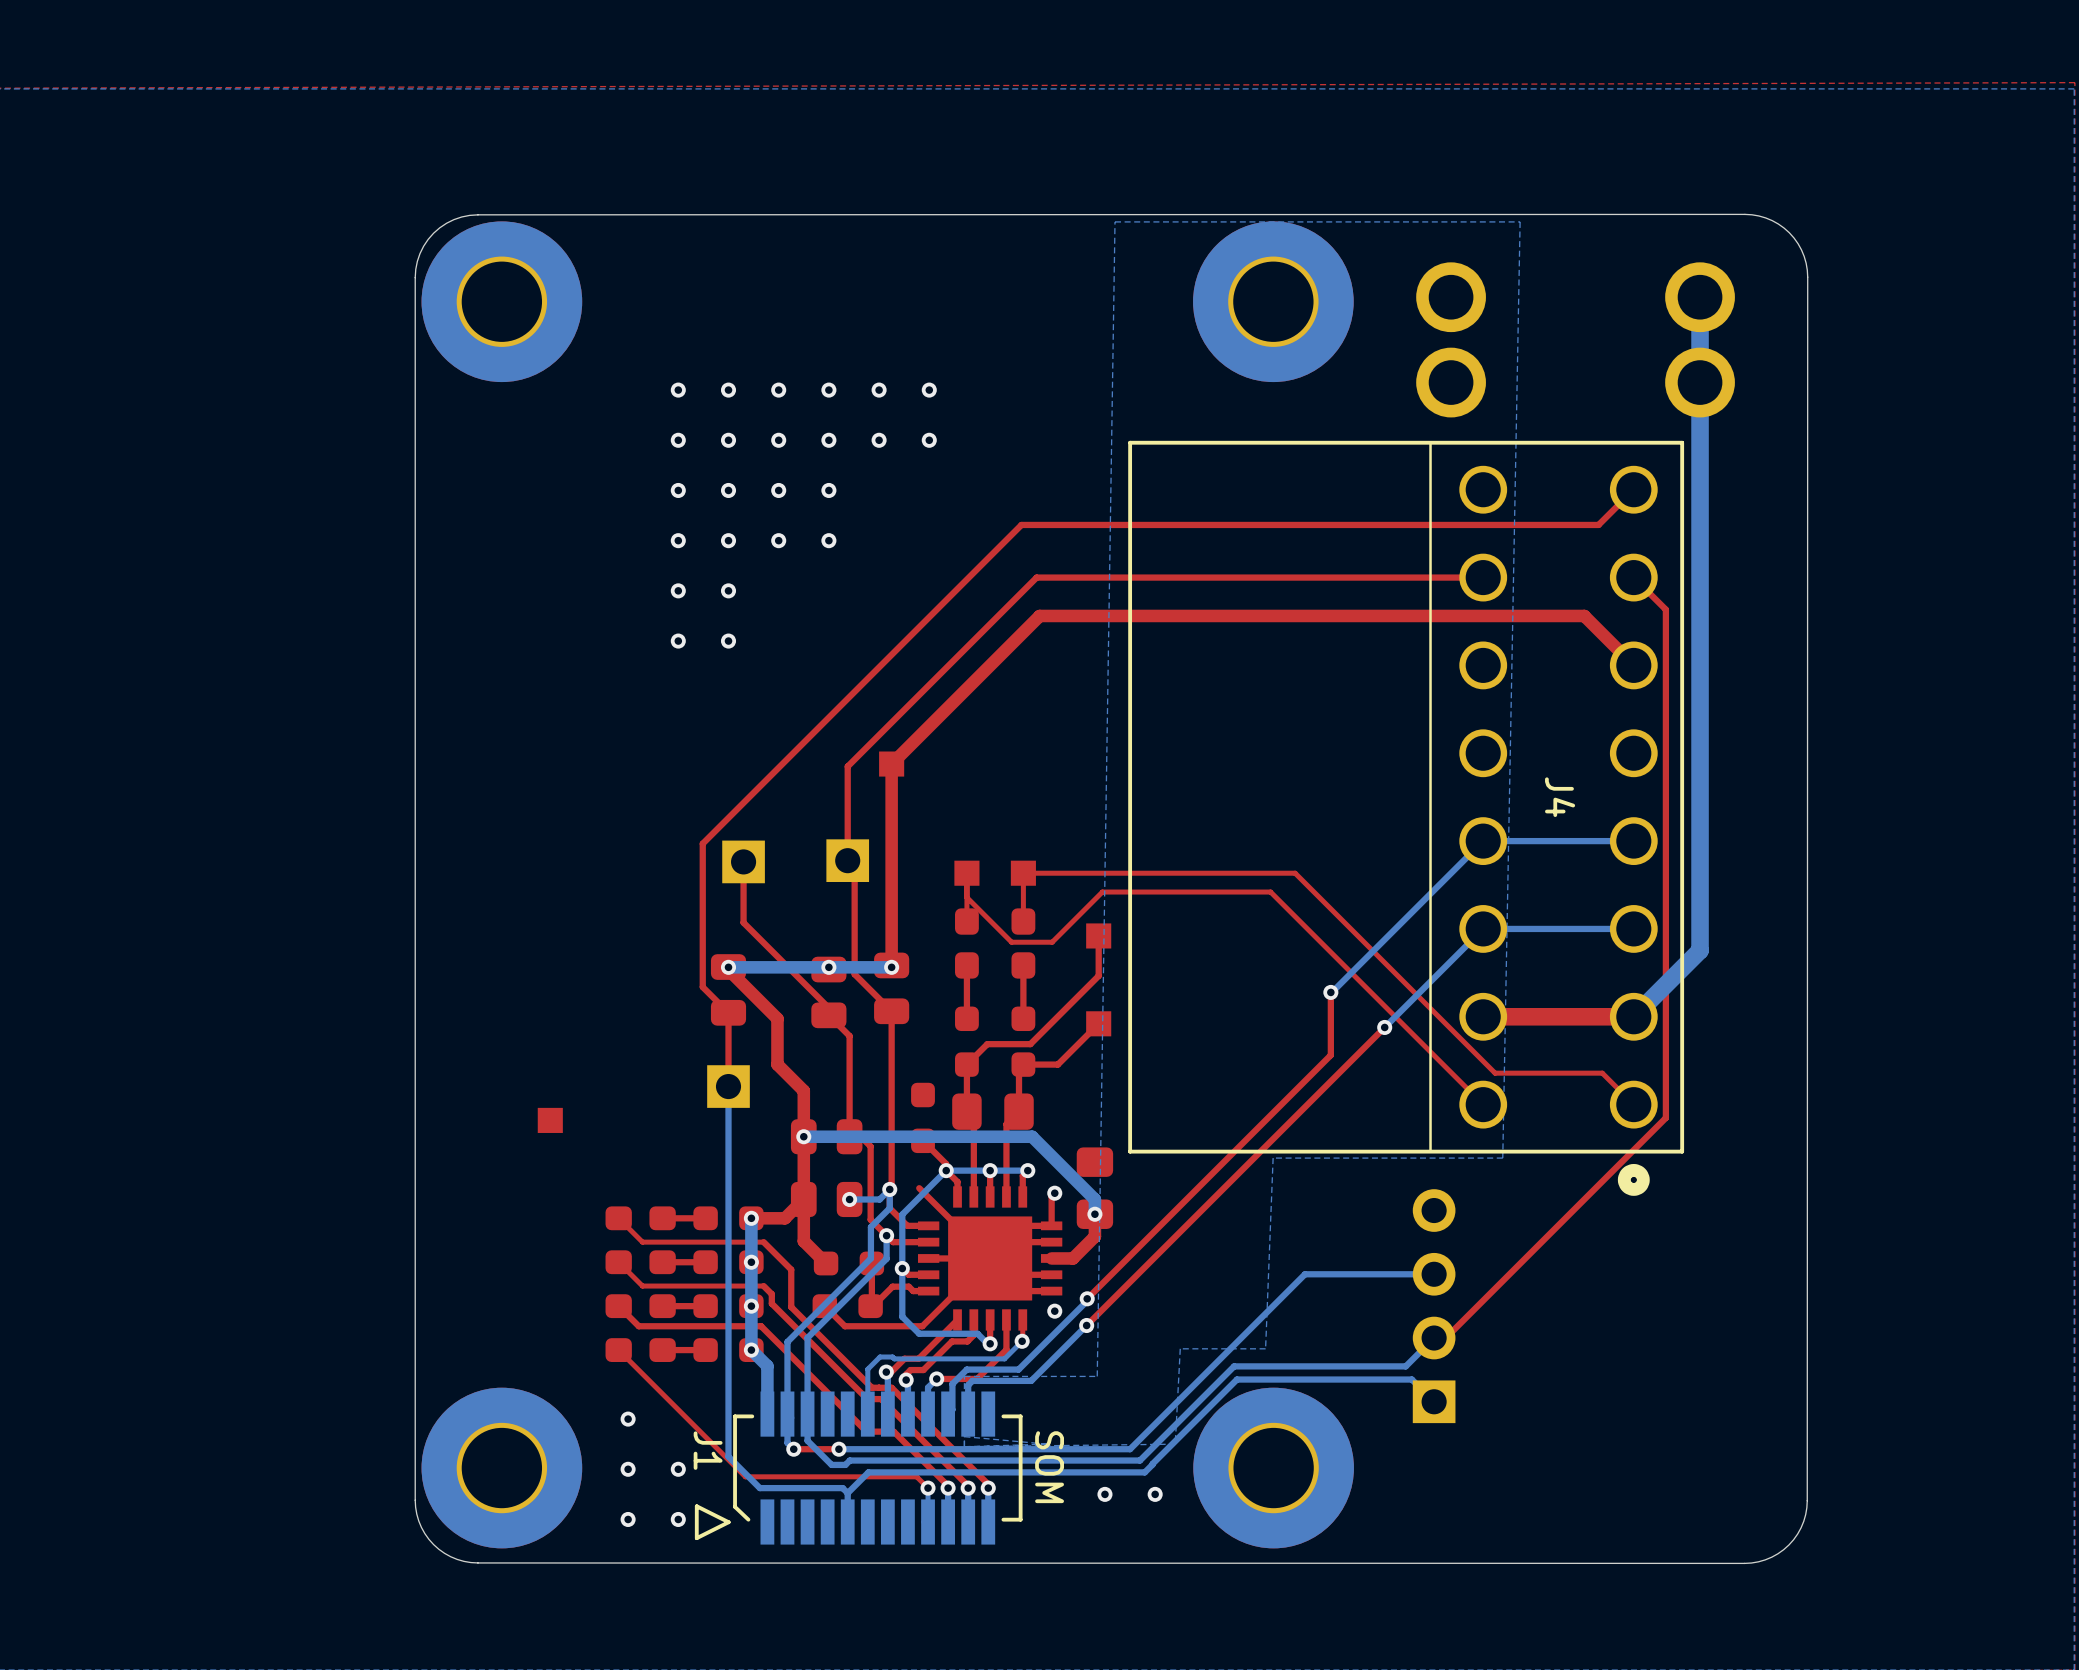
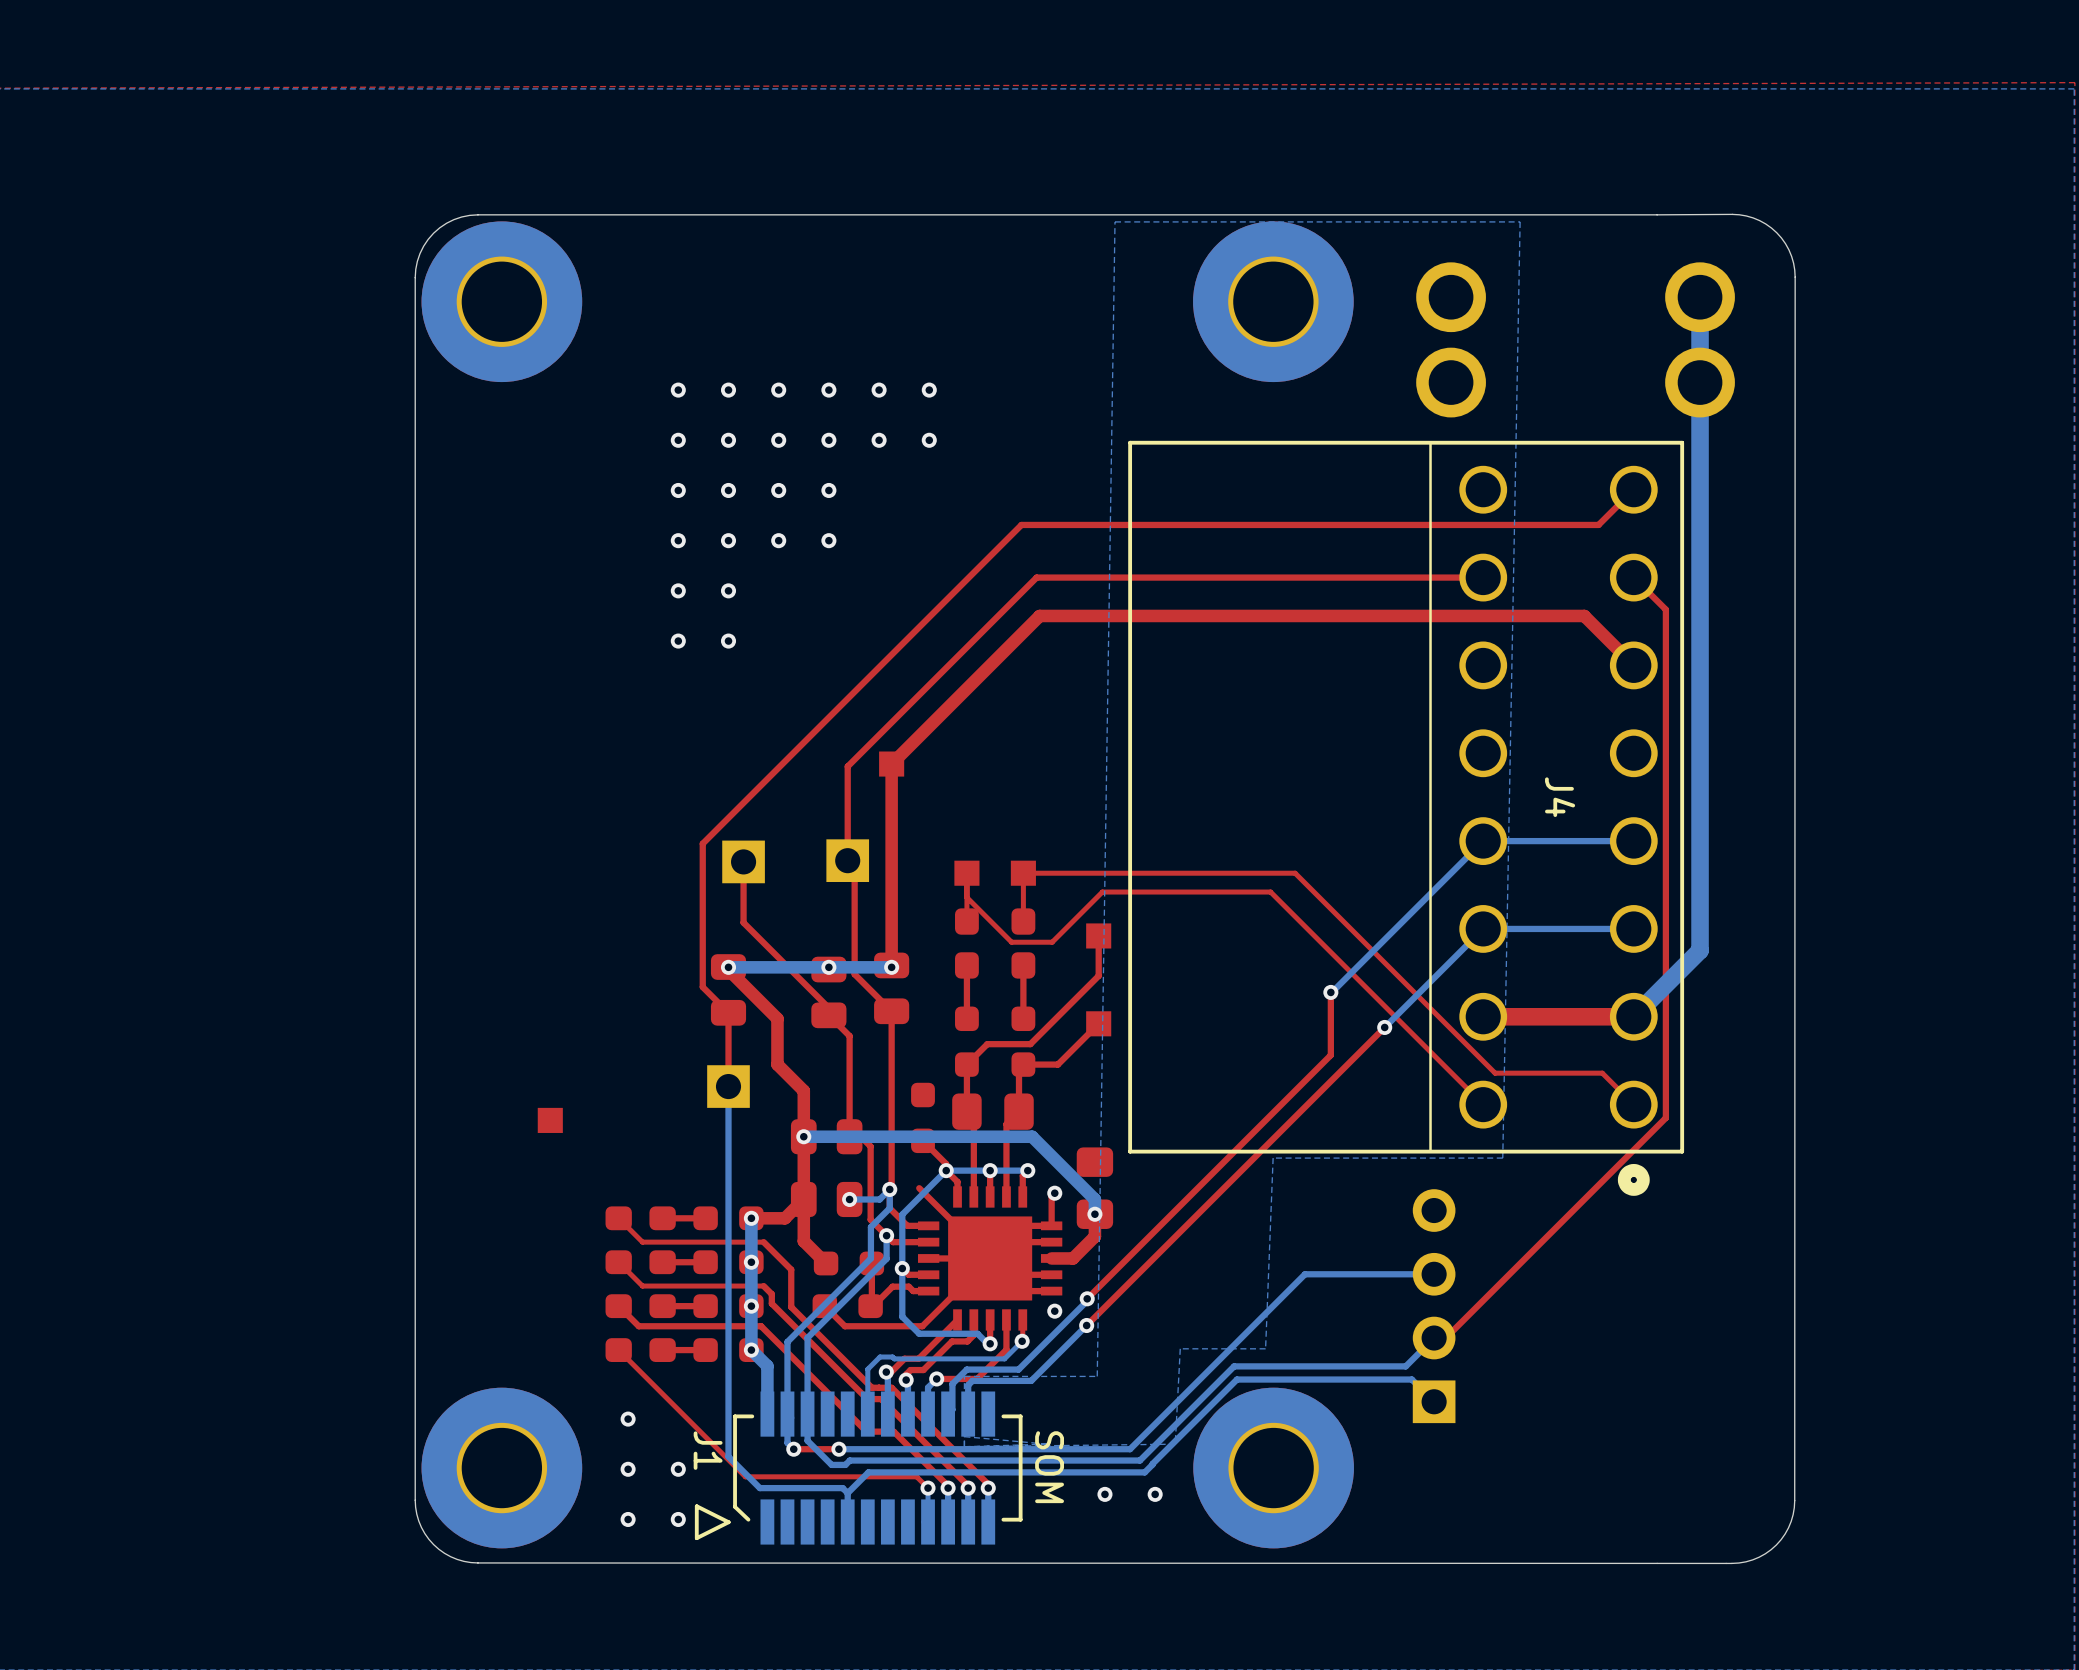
board edge: (477, 214) (1744, 214) (1758, 215) (1772, 220) (1789, 232) (1801, 249) (1806, 263) (1807, 277) (1807, 1500) (1805, 1514) (1801, 1527) (1793, 1539) (1783, 1549) (1771, 1557) (1758, 1561) (1731, 1563) -> (477, 214) (1732, 214) (1746, 215) (1759, 220) (1776, 232) (1788, 249) (1793, 263) (1795, 277) (1794, 1500) (1793, 1514) (1788, 1527) (1776, 1545) (1765, 1553) (1752, 1559) (1731, 1563)

